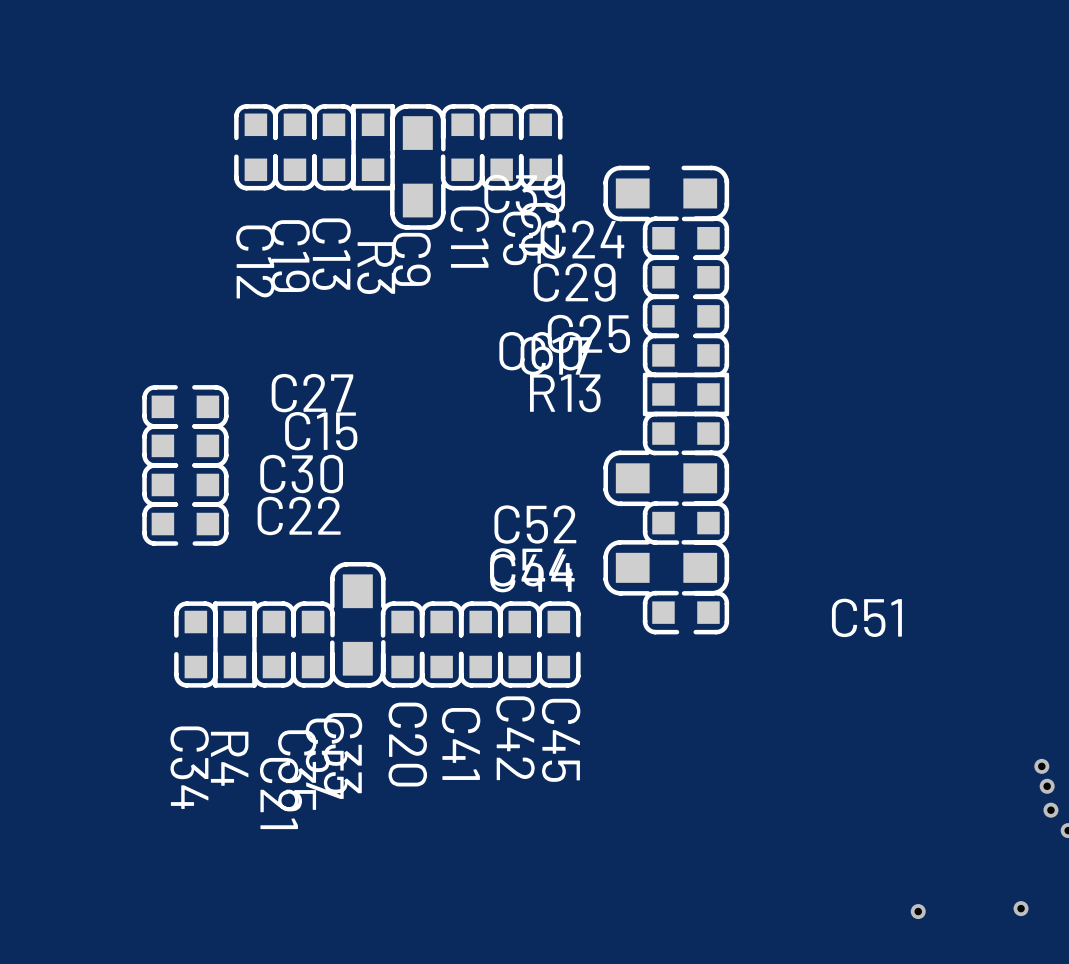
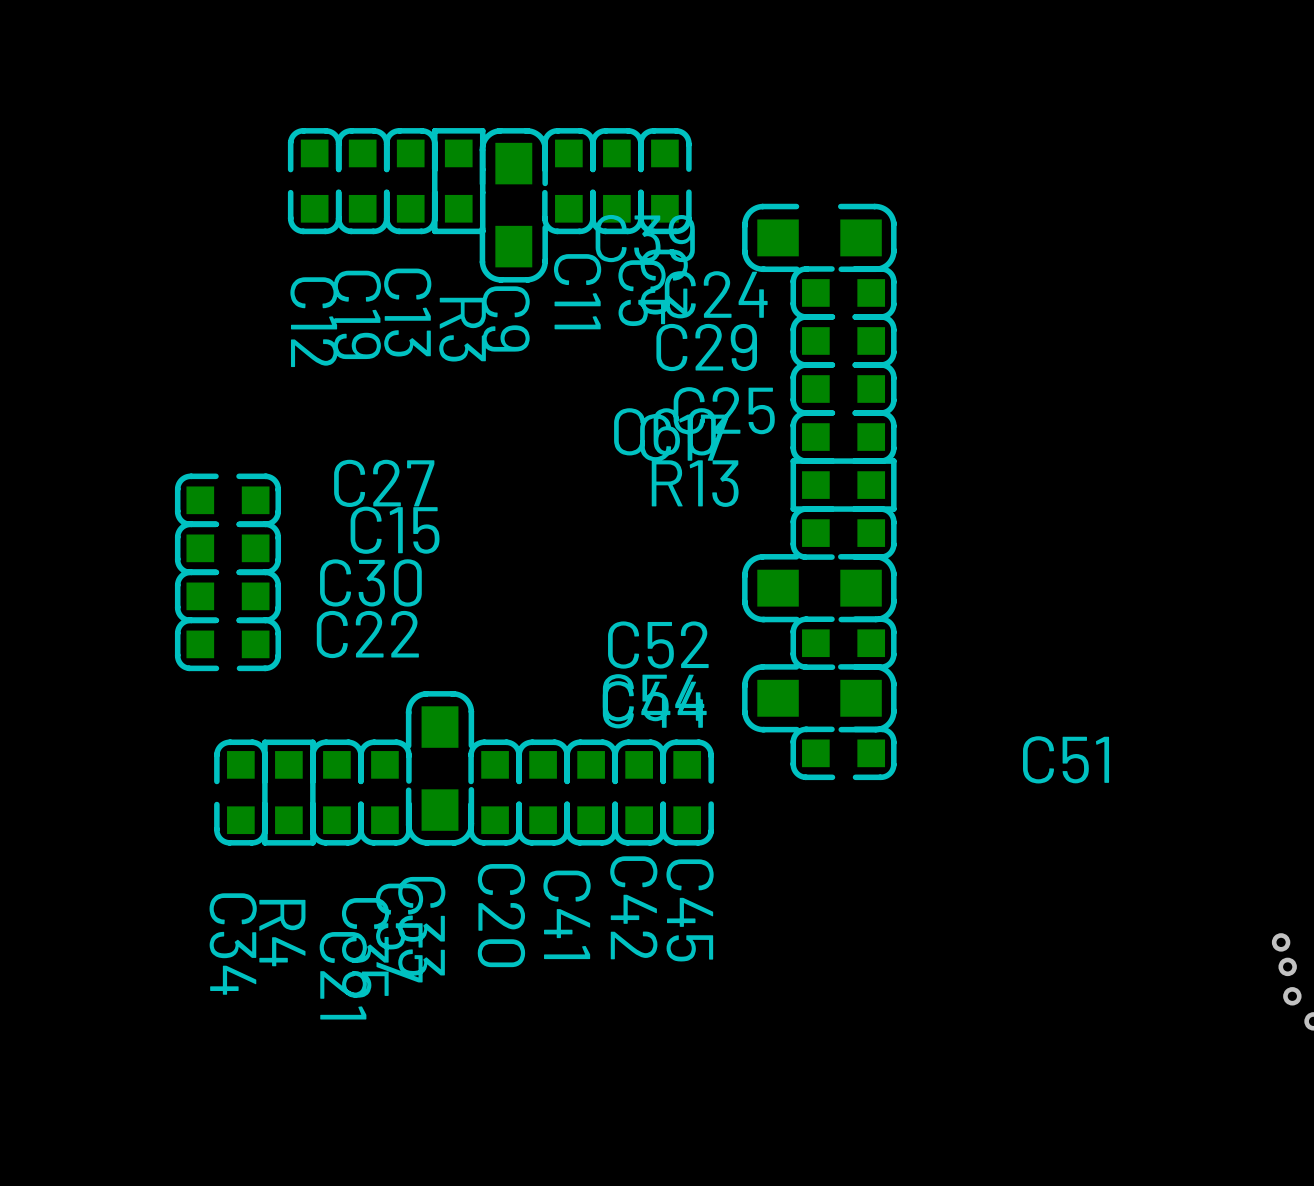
via: (1021, 908) -> none
via: (918, 911) -> none

